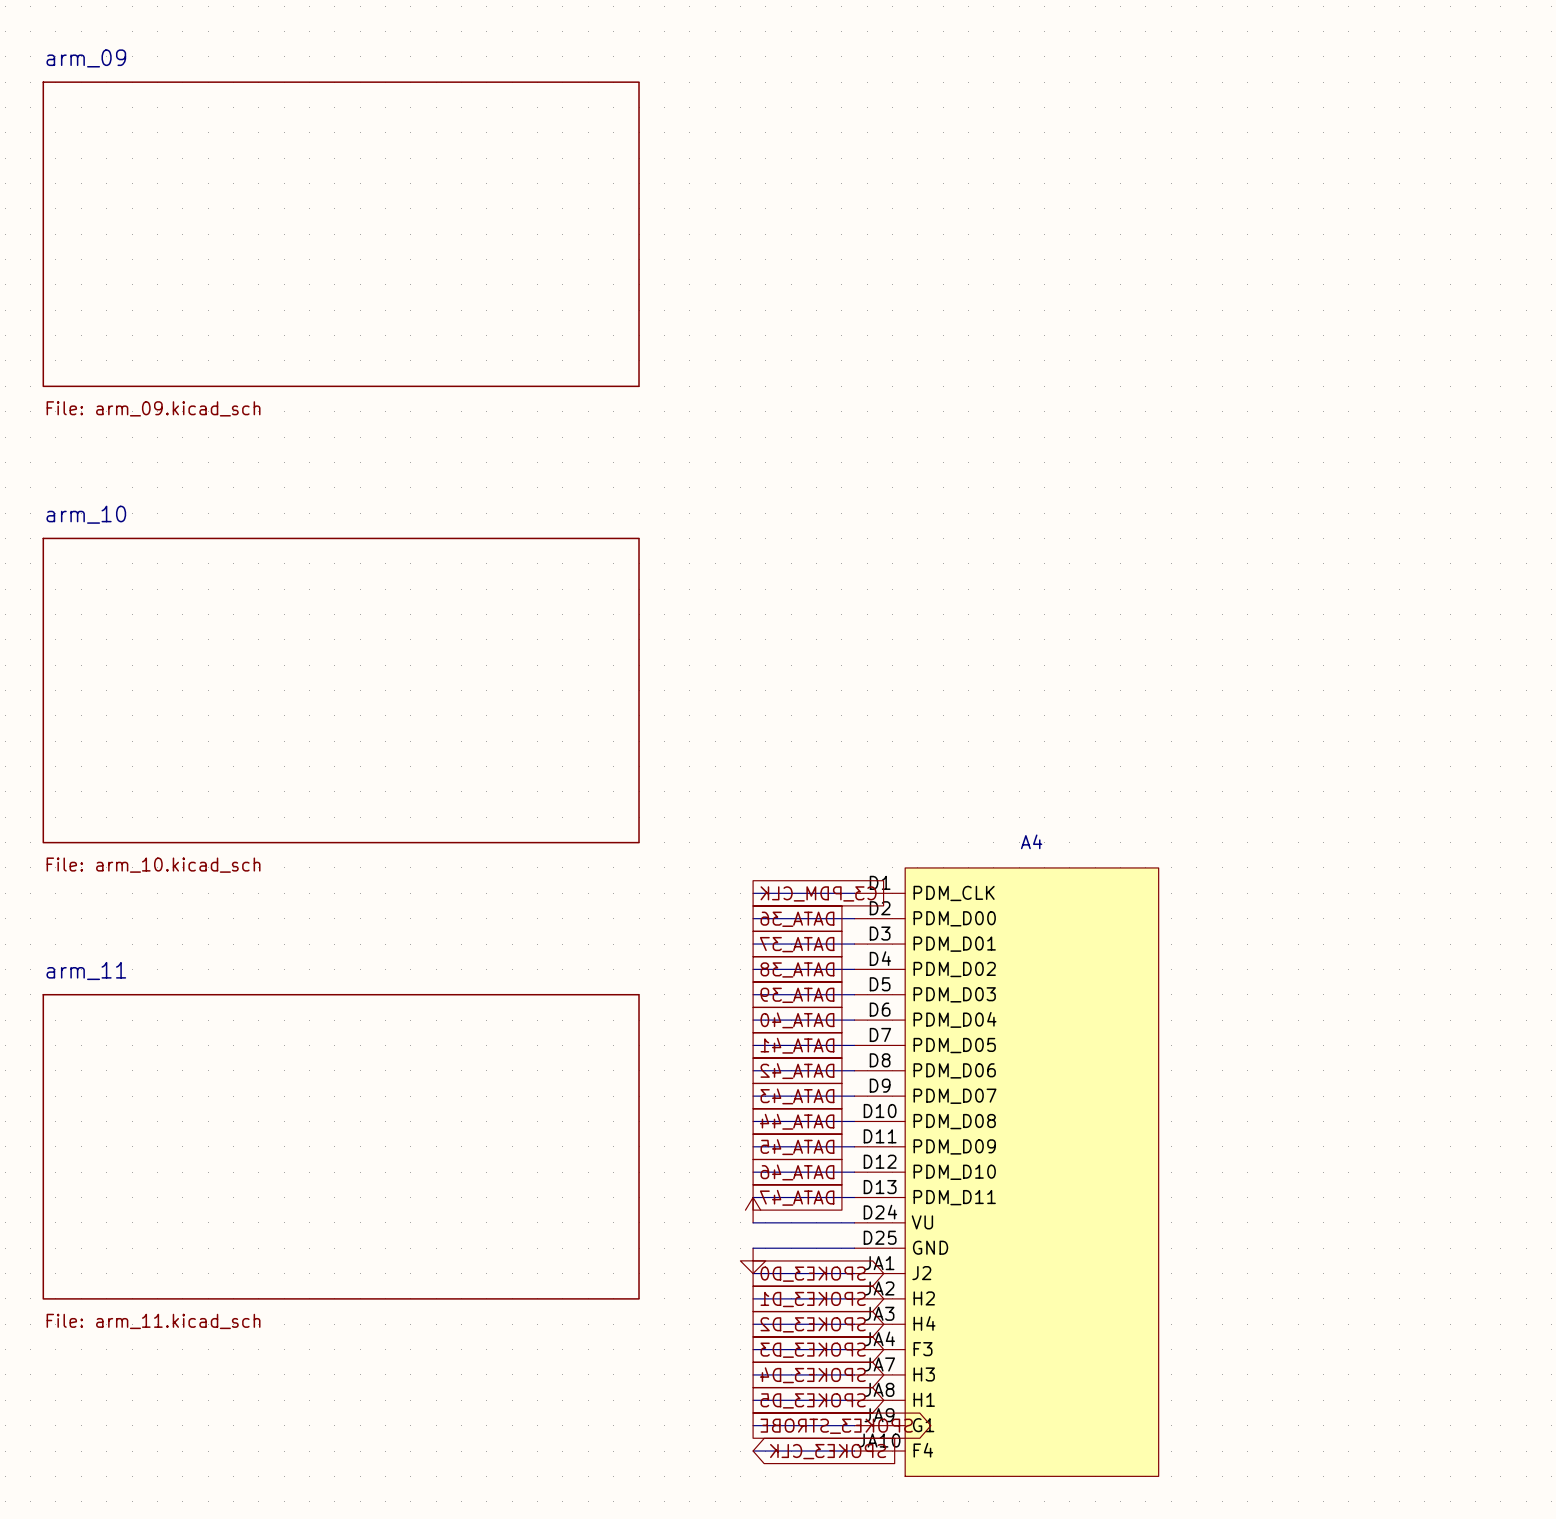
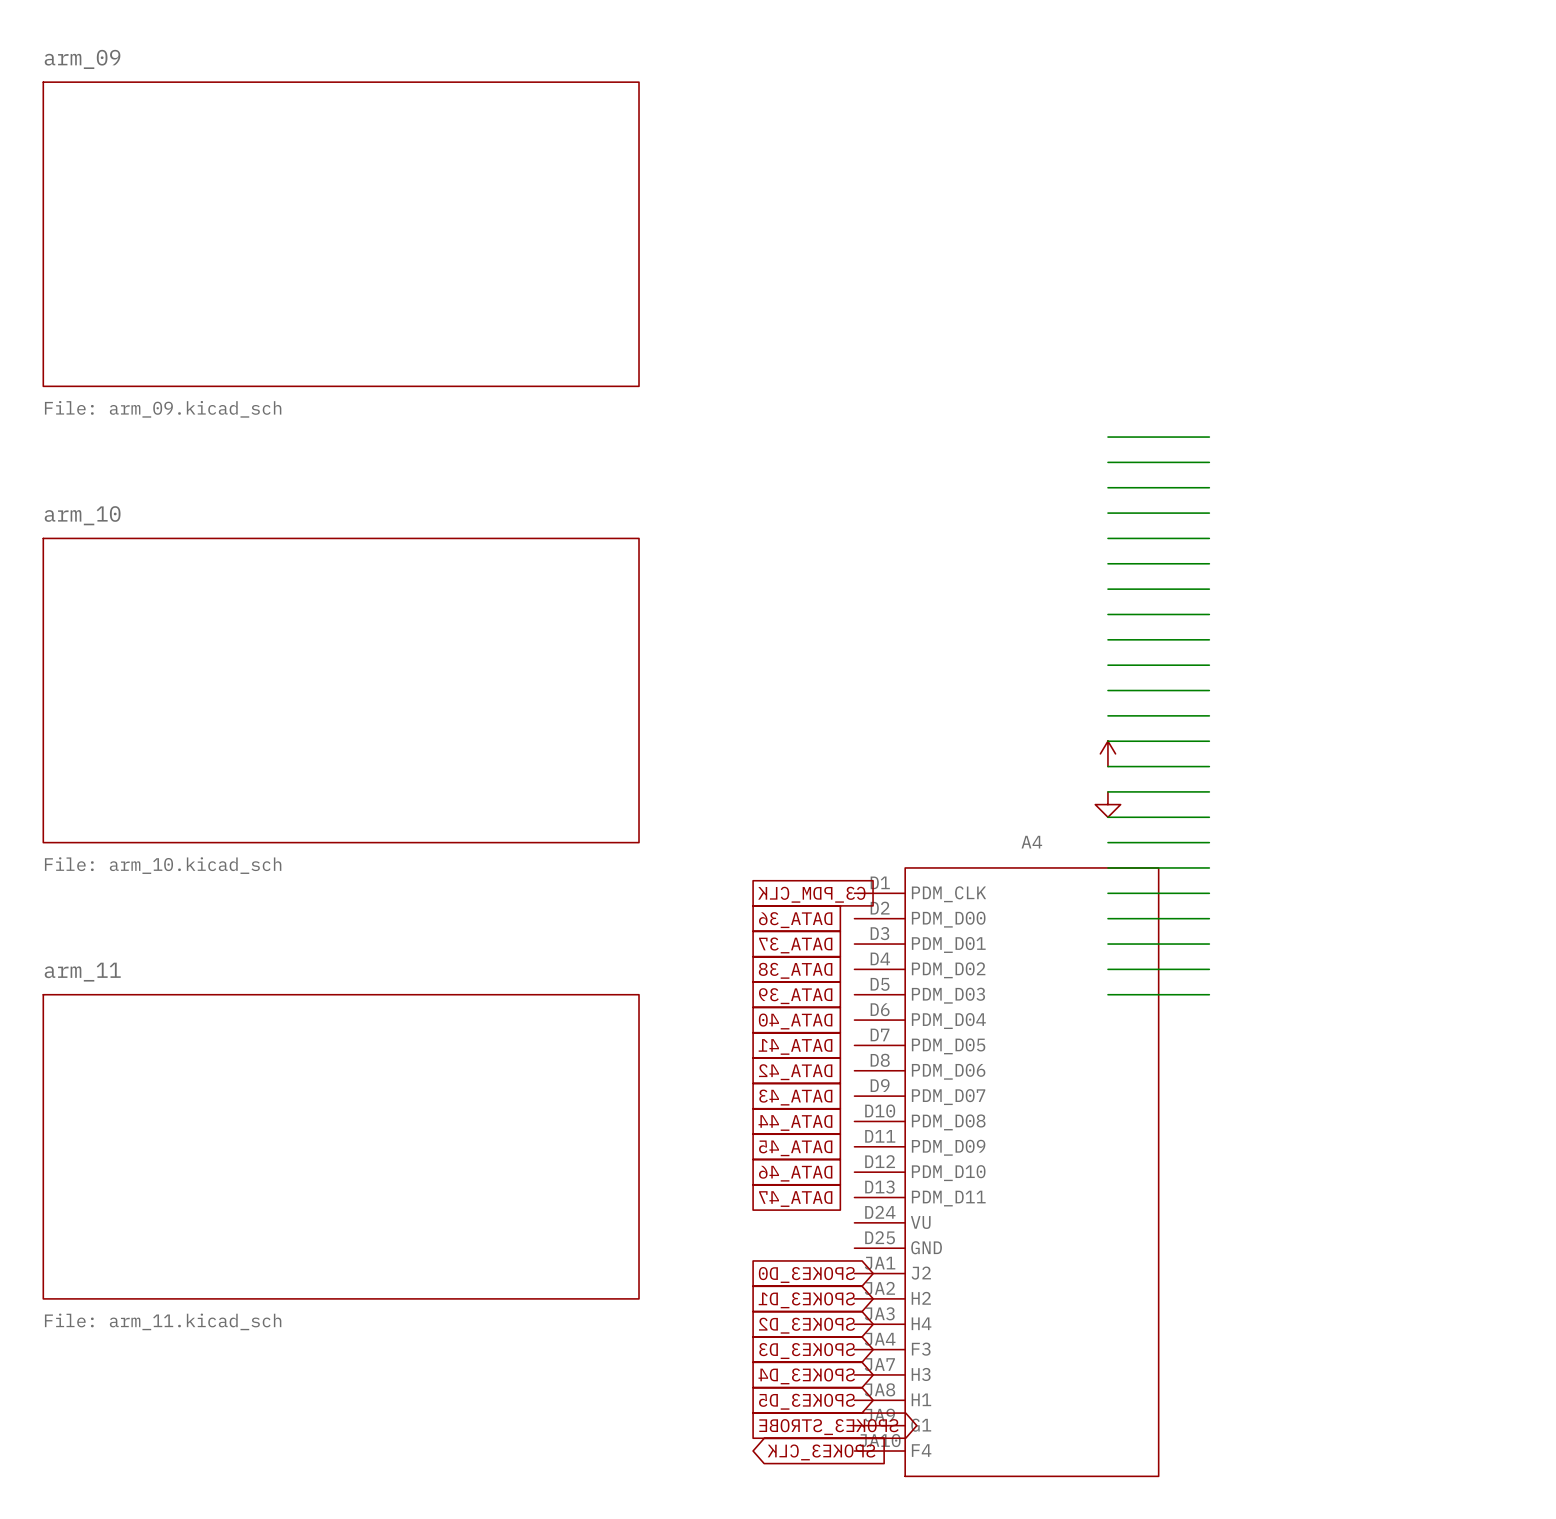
wire: none -> (1107, 437) (1209, 437)
wire: none -> (1107, 462) (1209, 462)
wire: none -> (1107, 487) (1209, 487)
wire: none -> (1107, 513) (1209, 513)
wire: none -> (1107, 538) (1209, 538)
wire: none -> (1107, 563) (1209, 563)
wire: none -> (1107, 589) (1209, 589)
wire: none -> (1107, 614) (1209, 614)
wire: none -> (1107, 639) (1209, 639)
wire: none -> (1107, 665) (1209, 665)
wire: none -> (1107, 690) (1209, 690)
wire: none -> (1107, 715) (1209, 715)
wire: none -> (1107, 741) (1209, 741)
power symbol: none -> (1107, 753)
wire: none -> (1107, 766) (1209, 766)
wire: none -> (1107, 791) (1209, 791)
power symbol: none -> (1107, 804)
wire: none -> (1107, 817) (1209, 817)
wire: none -> (1107, 842) (1209, 842)
wire: none -> (1107, 867) (1209, 867)
wire: (753, 893) (854, 893) -> none
wire: none -> (1107, 893) (1209, 893)
wire: (753, 918) (854, 918) -> none
wire: none -> (1107, 918) (1209, 918)
wire: (753, 944) (854, 944) -> none
wire: none -> (1107, 944) (1209, 944)
wire: (753, 969) (854, 969) -> none
wire: none -> (1107, 969) (1209, 969)
wire: (753, 994) (854, 994) -> none
wire: none -> (1107, 994) (1209, 994)
wire: (753, 1020) (854, 1020) -> none
wire: (753, 1045) (854, 1045) -> none
wire: (753, 1070) (854, 1070) -> none
wire: (753, 1096) (854, 1096) -> none
wire: (753, 1121) (854, 1121) -> none
wire: (753, 1146) (854, 1146) -> none
wire: (753, 1172) (854, 1172) -> none
wire: (753, 1197) (854, 1197) -> none
power symbol: (753, 1210) -> none
wire: (753, 1222) (854, 1222) -> none
wire: (753, 1248) (854, 1248) -> none
power symbol: (753, 1260) -> none
wire: (753, 1273) (854, 1273) -> none
wire: (753, 1298) (854, 1298) -> none
wire: (753, 1324) (854, 1324) -> none
wire: (753, 1349) (854, 1349) -> none
wire: (753, 1374) (854, 1374) -> none
wire: (753, 1400) (854, 1400) -> none
wire: (753, 1425) (854, 1425) -> none
wire: (753, 1451) (854, 1451) -> none

